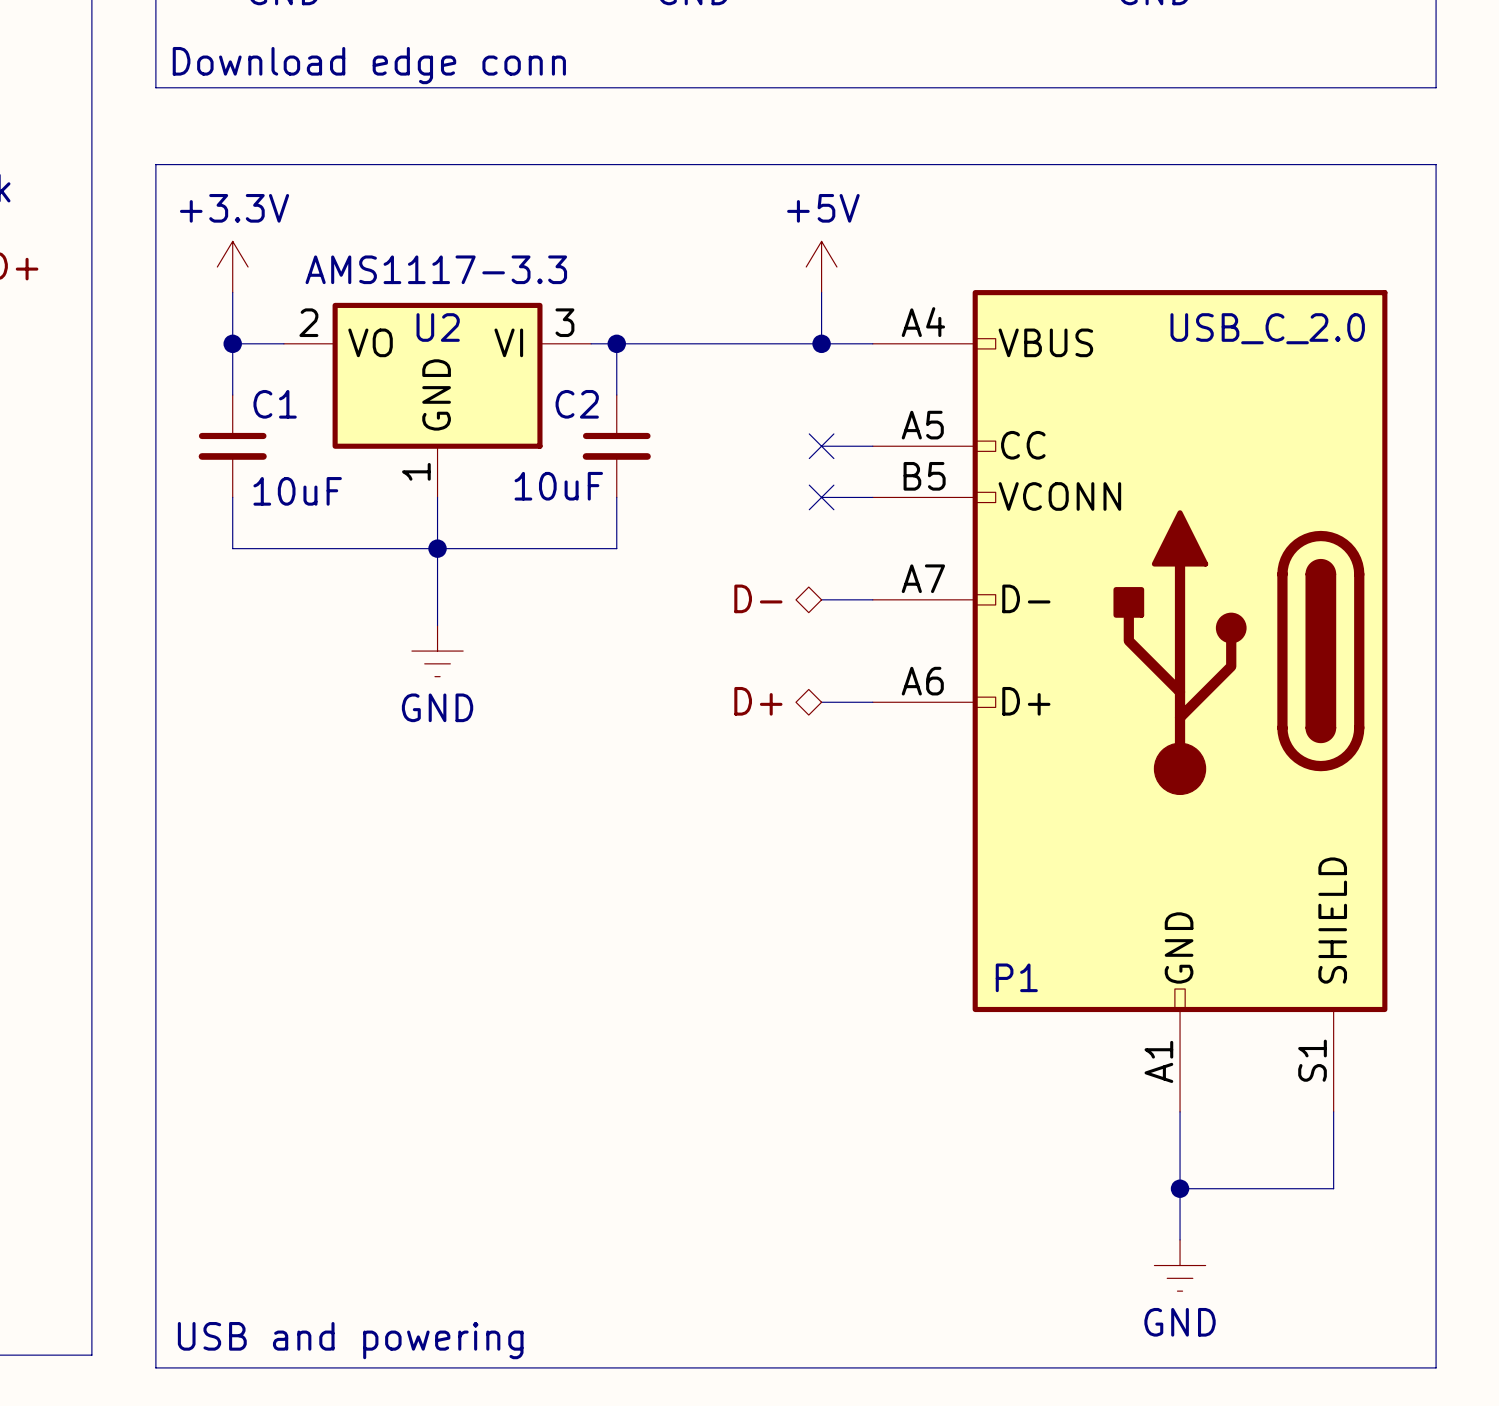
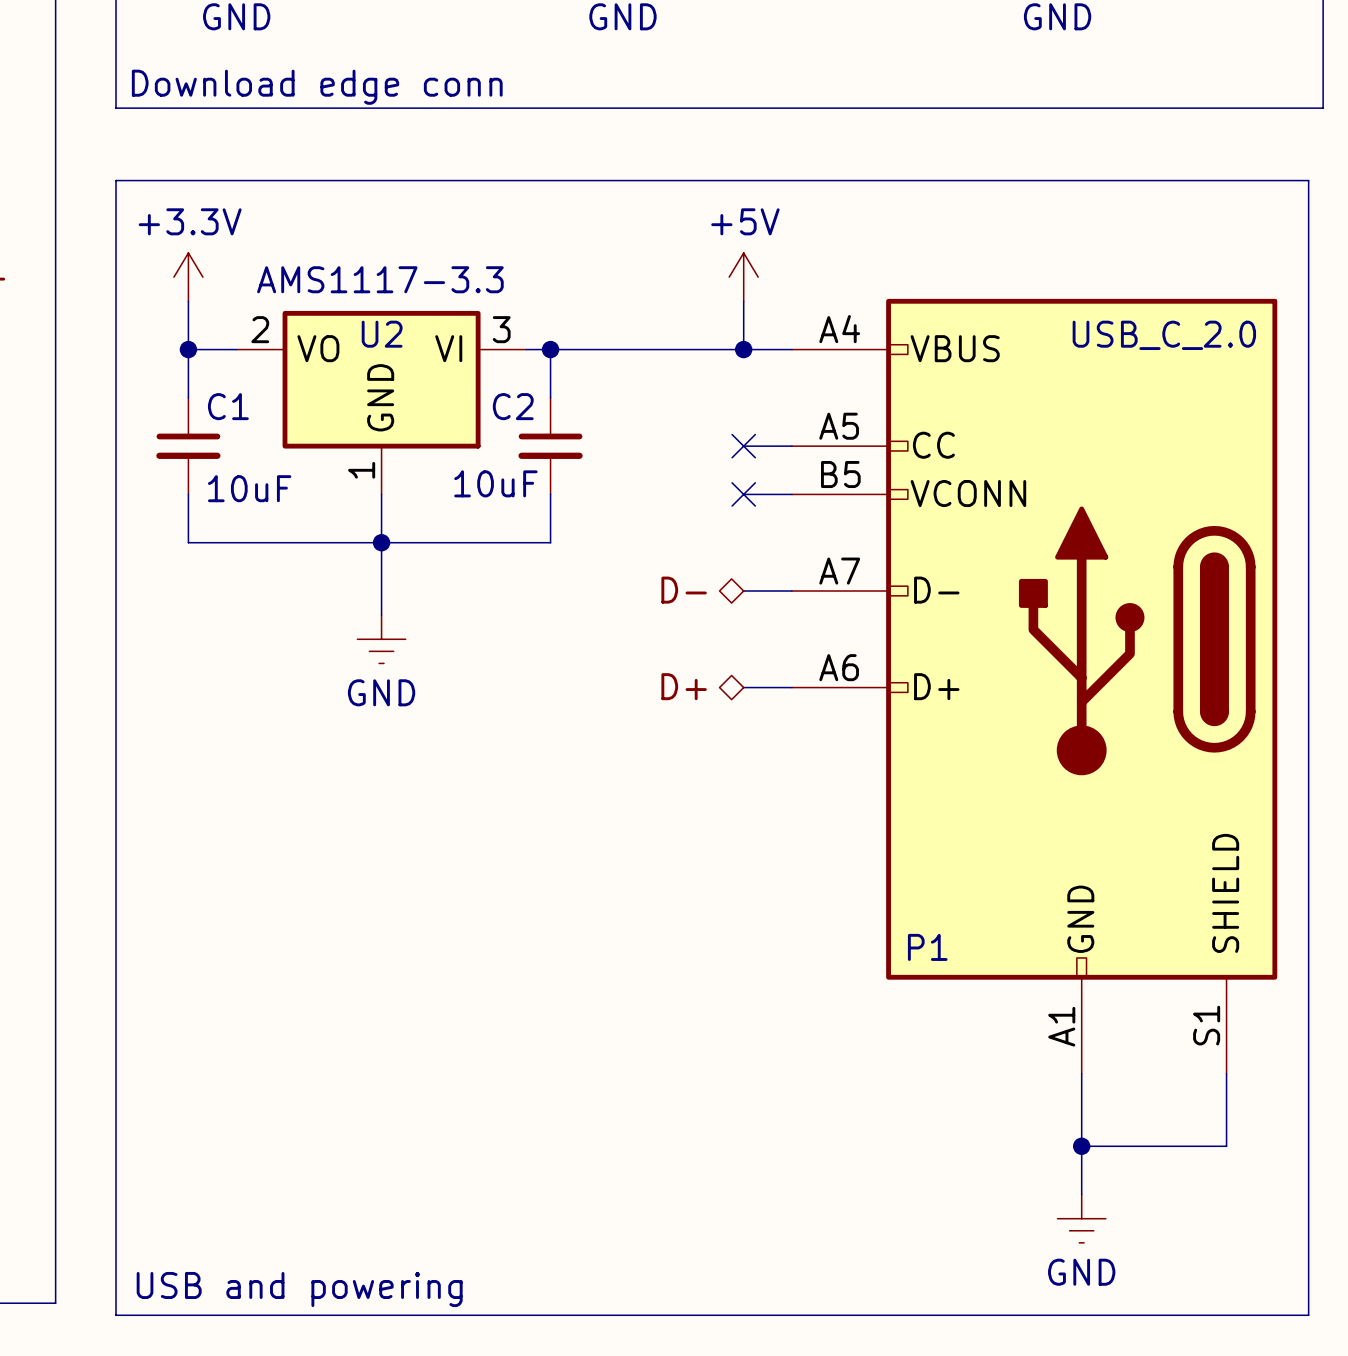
line: (1420, 164) (1436, 164) (1436, 1367) (1420, 1367) -> (1308, 180) (1308, 1315)

